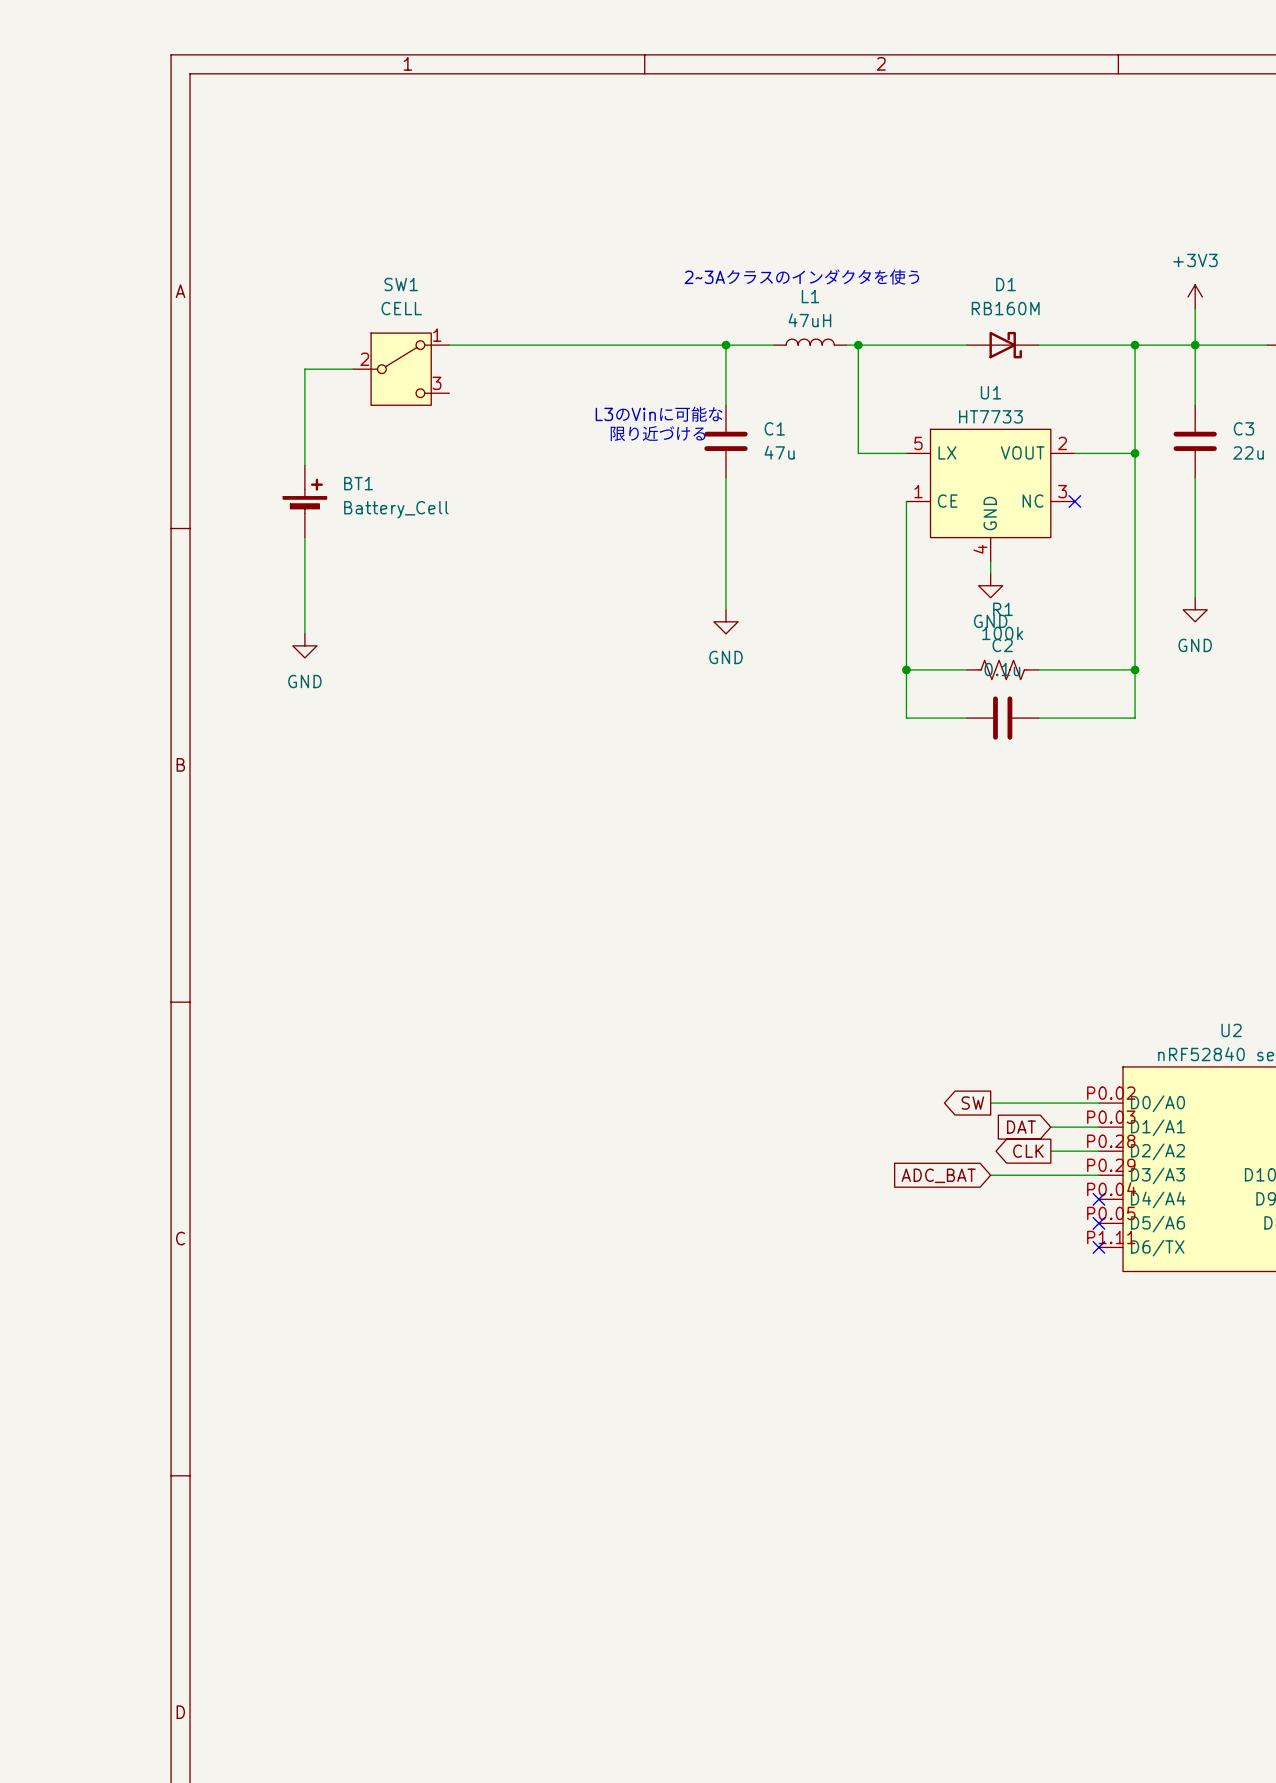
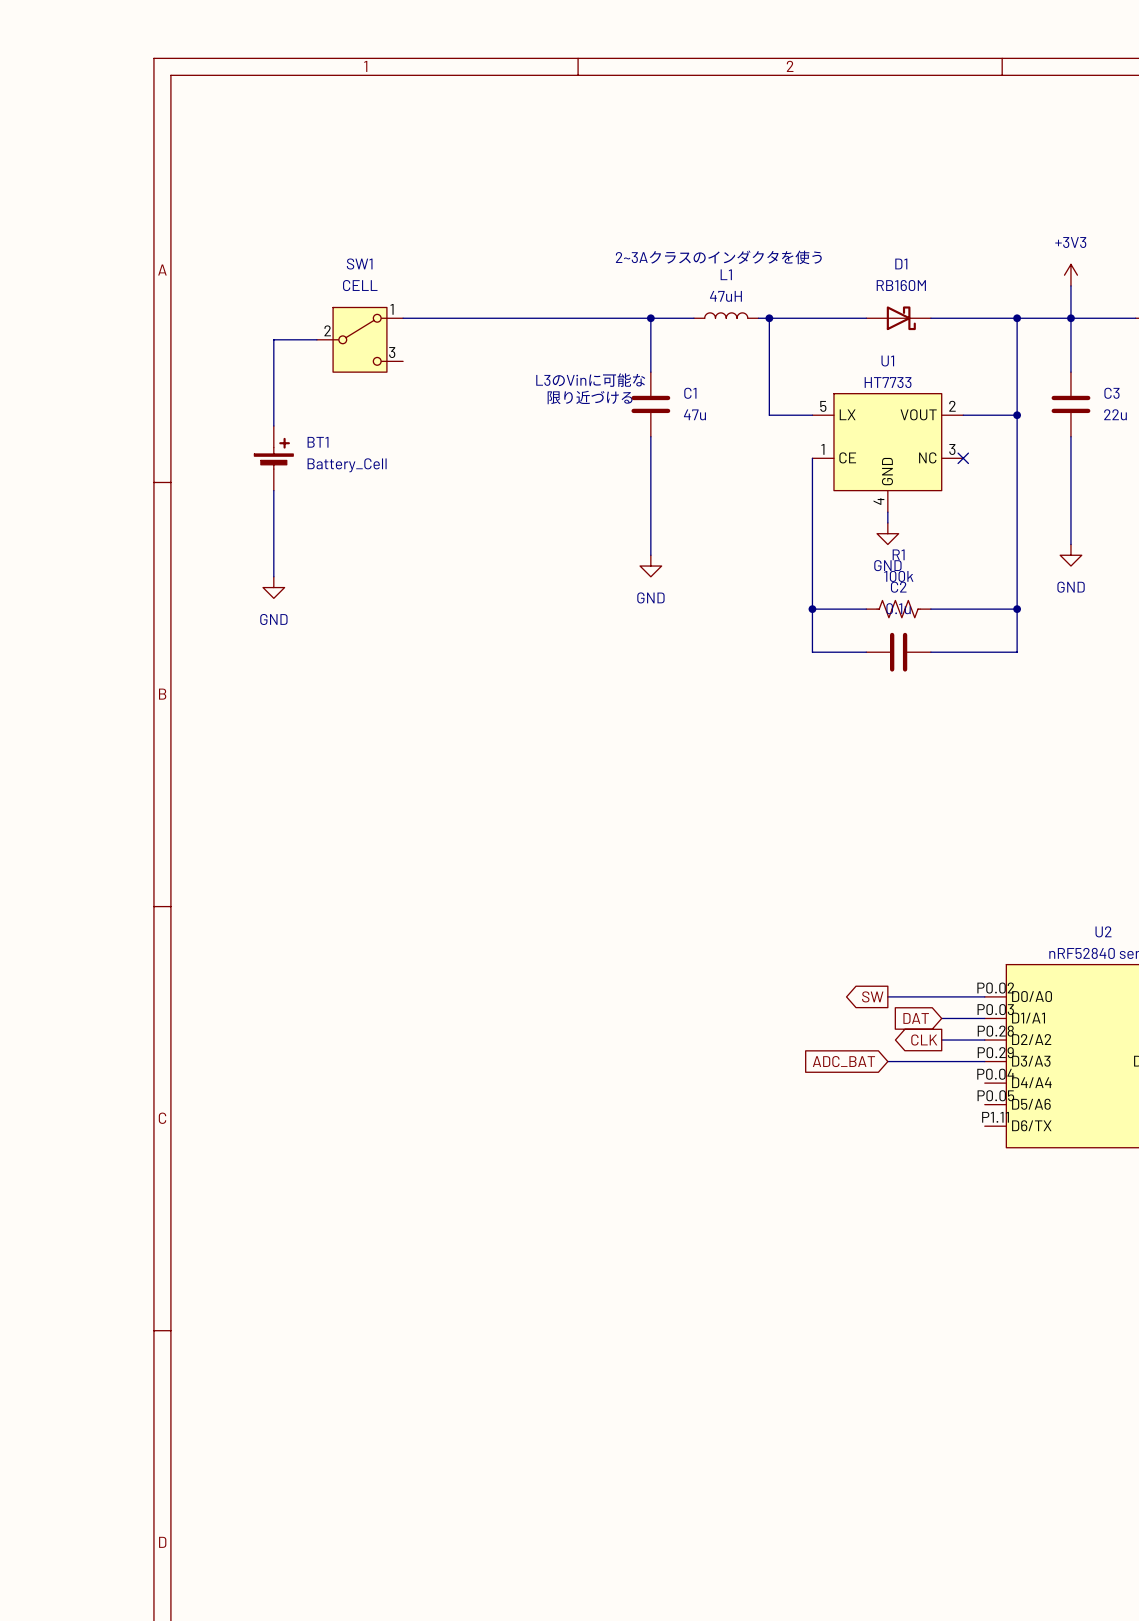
no-connect mark: (1098, 1199) -> none
no-connect mark: (1098, 1223) -> none
no-connect mark: (1098, 1247) -> none

